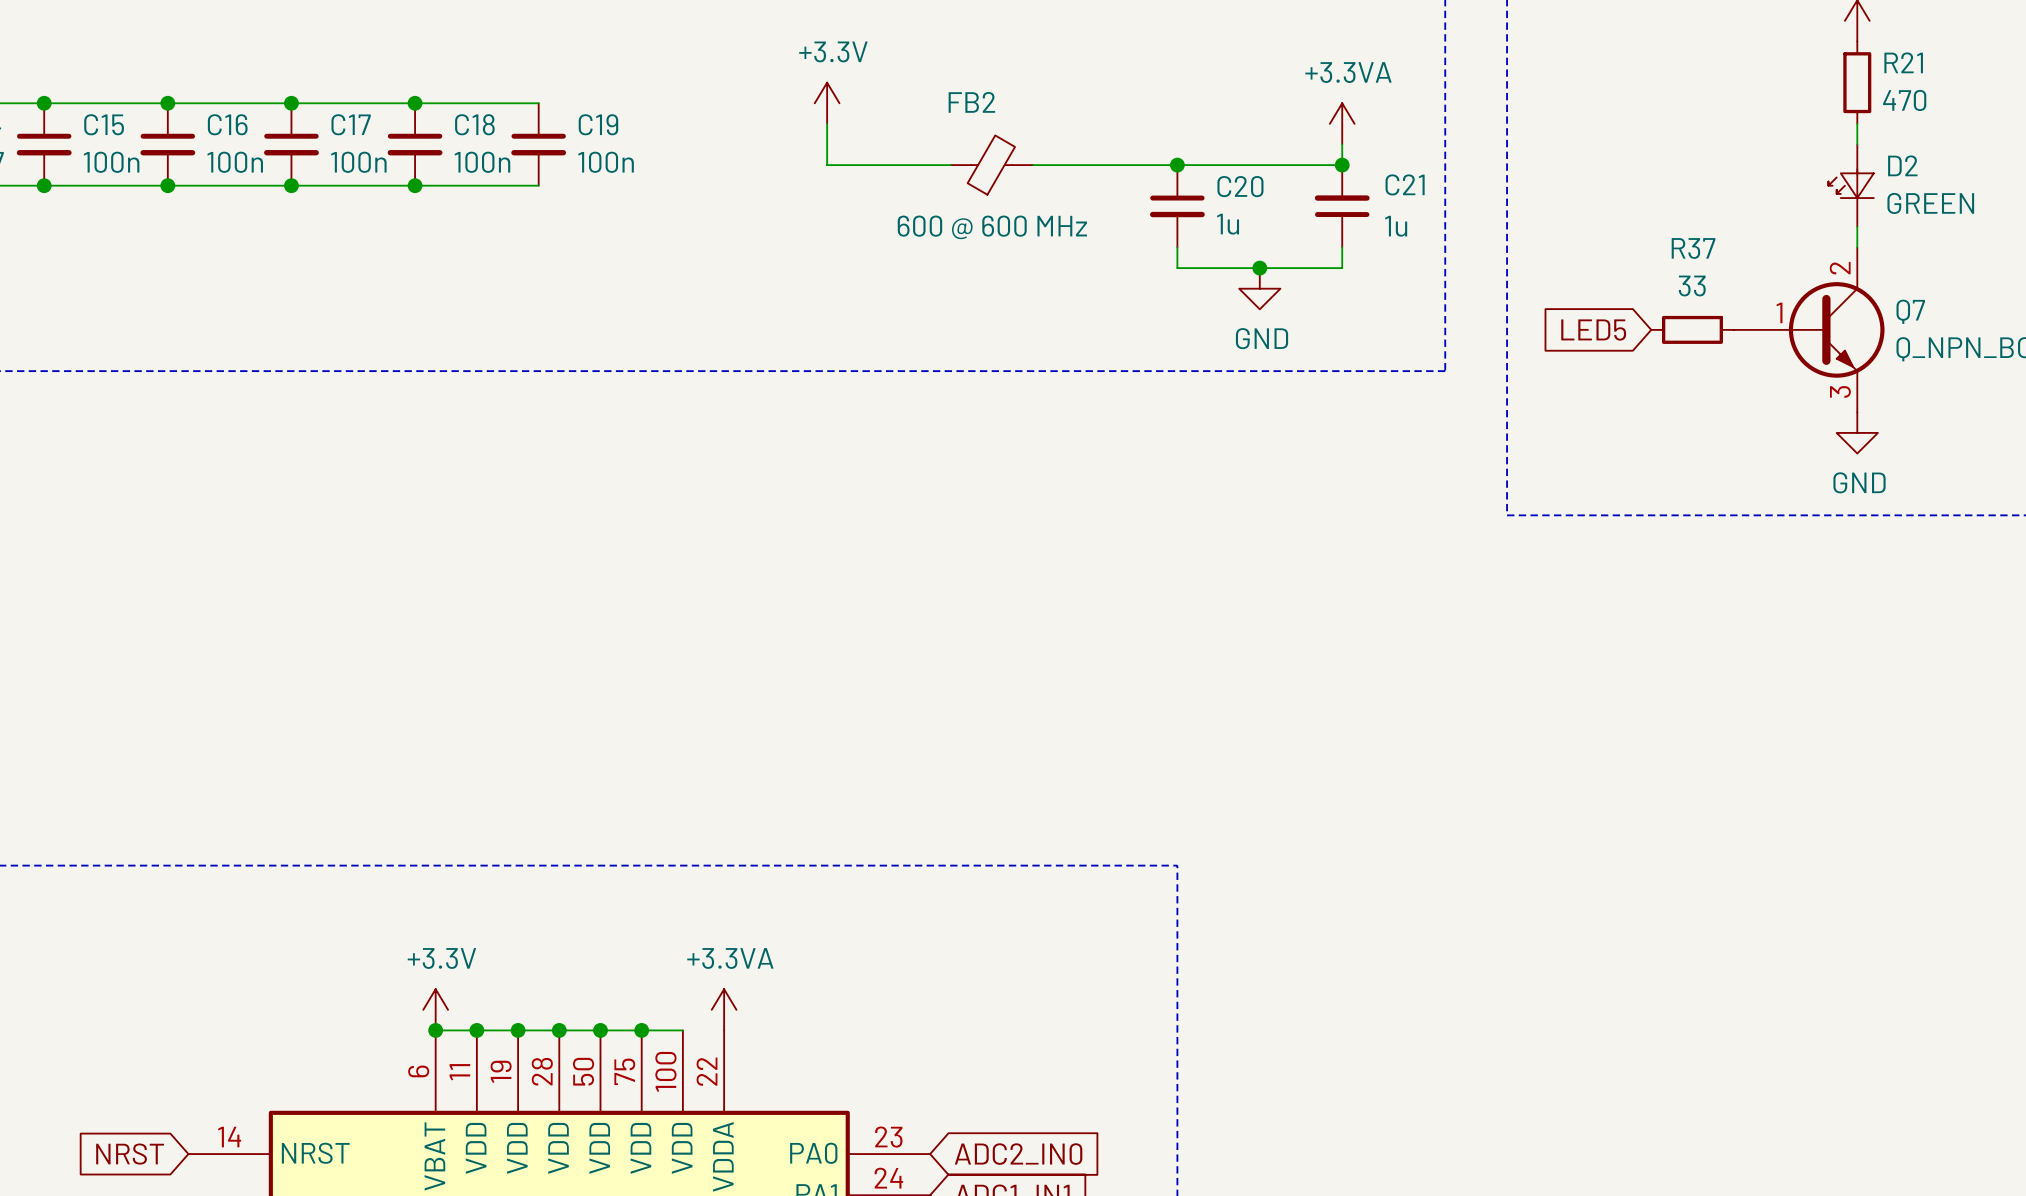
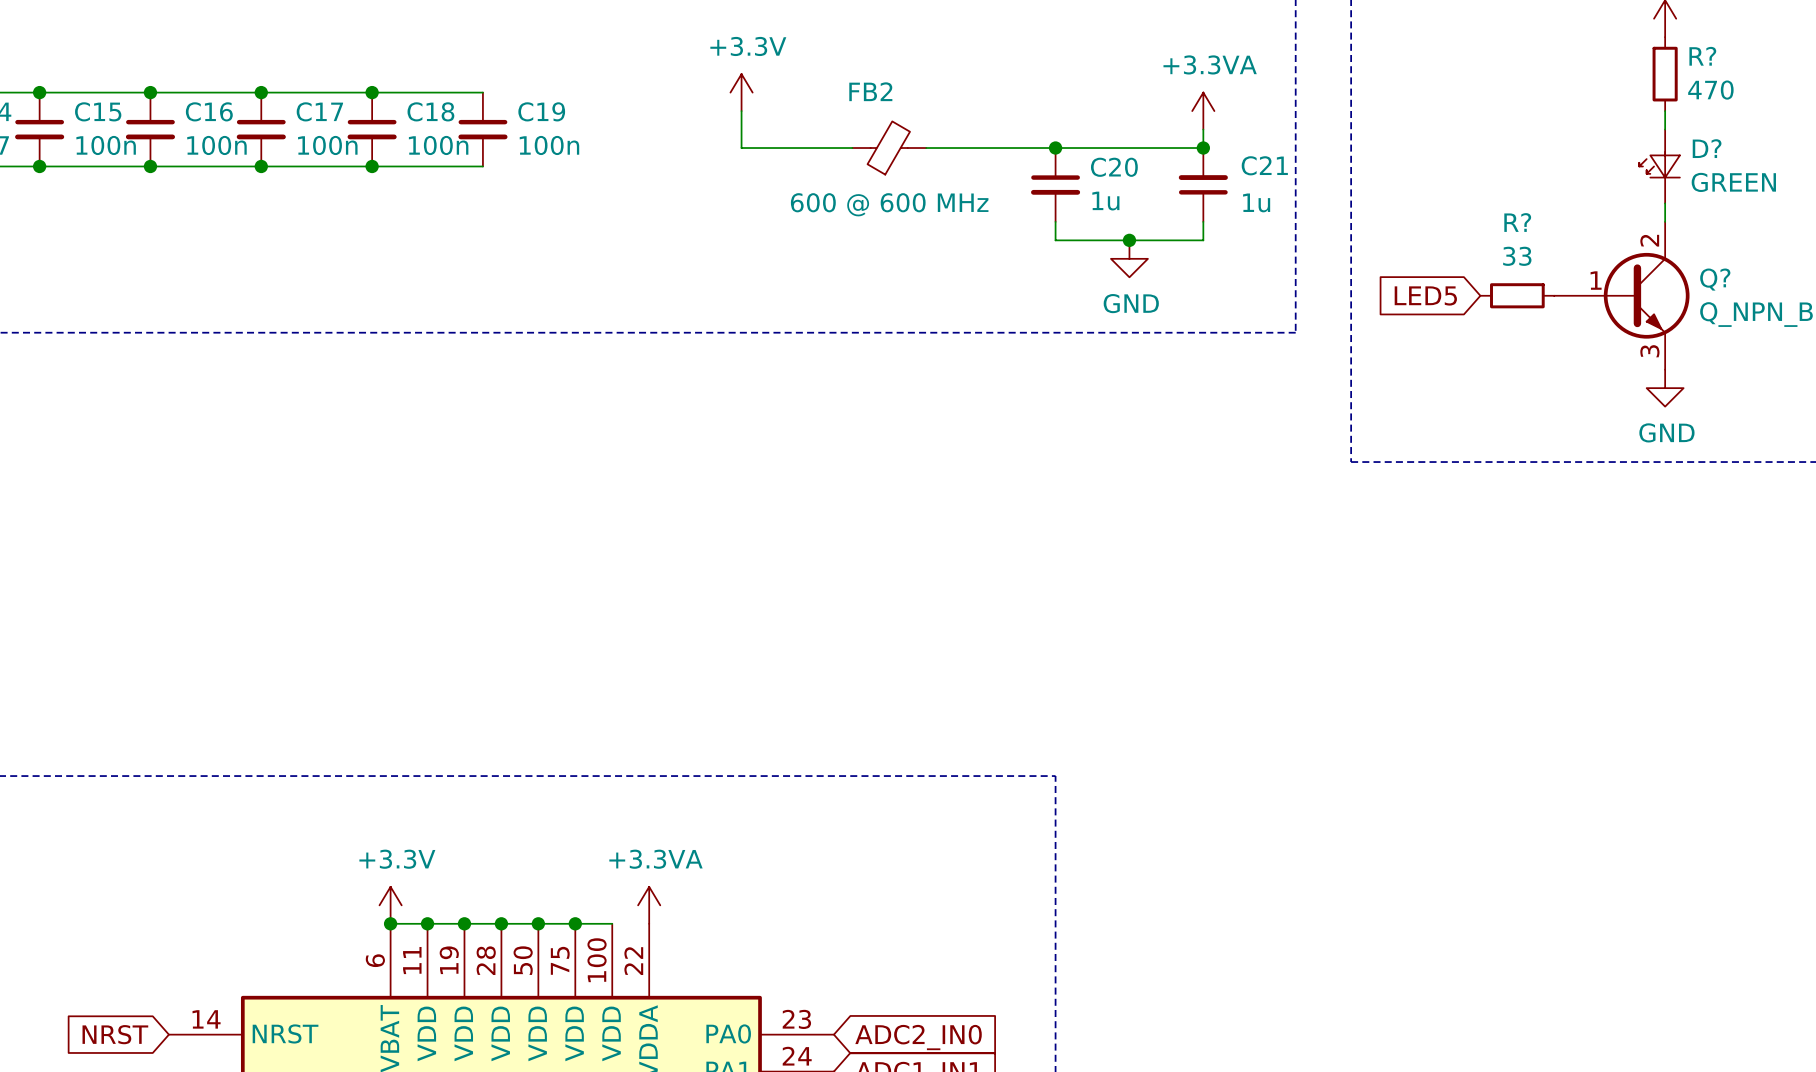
R21 name: R21 (1903, 62) -> R? (1702, 56)
D2 name: D2 (1902, 165) -> D? (1707, 148)
R37 name: R37 (1693, 248) -> R? (1517, 222)
Q7 name: Q7 (1910, 311) -> Q? (1715, 279)

